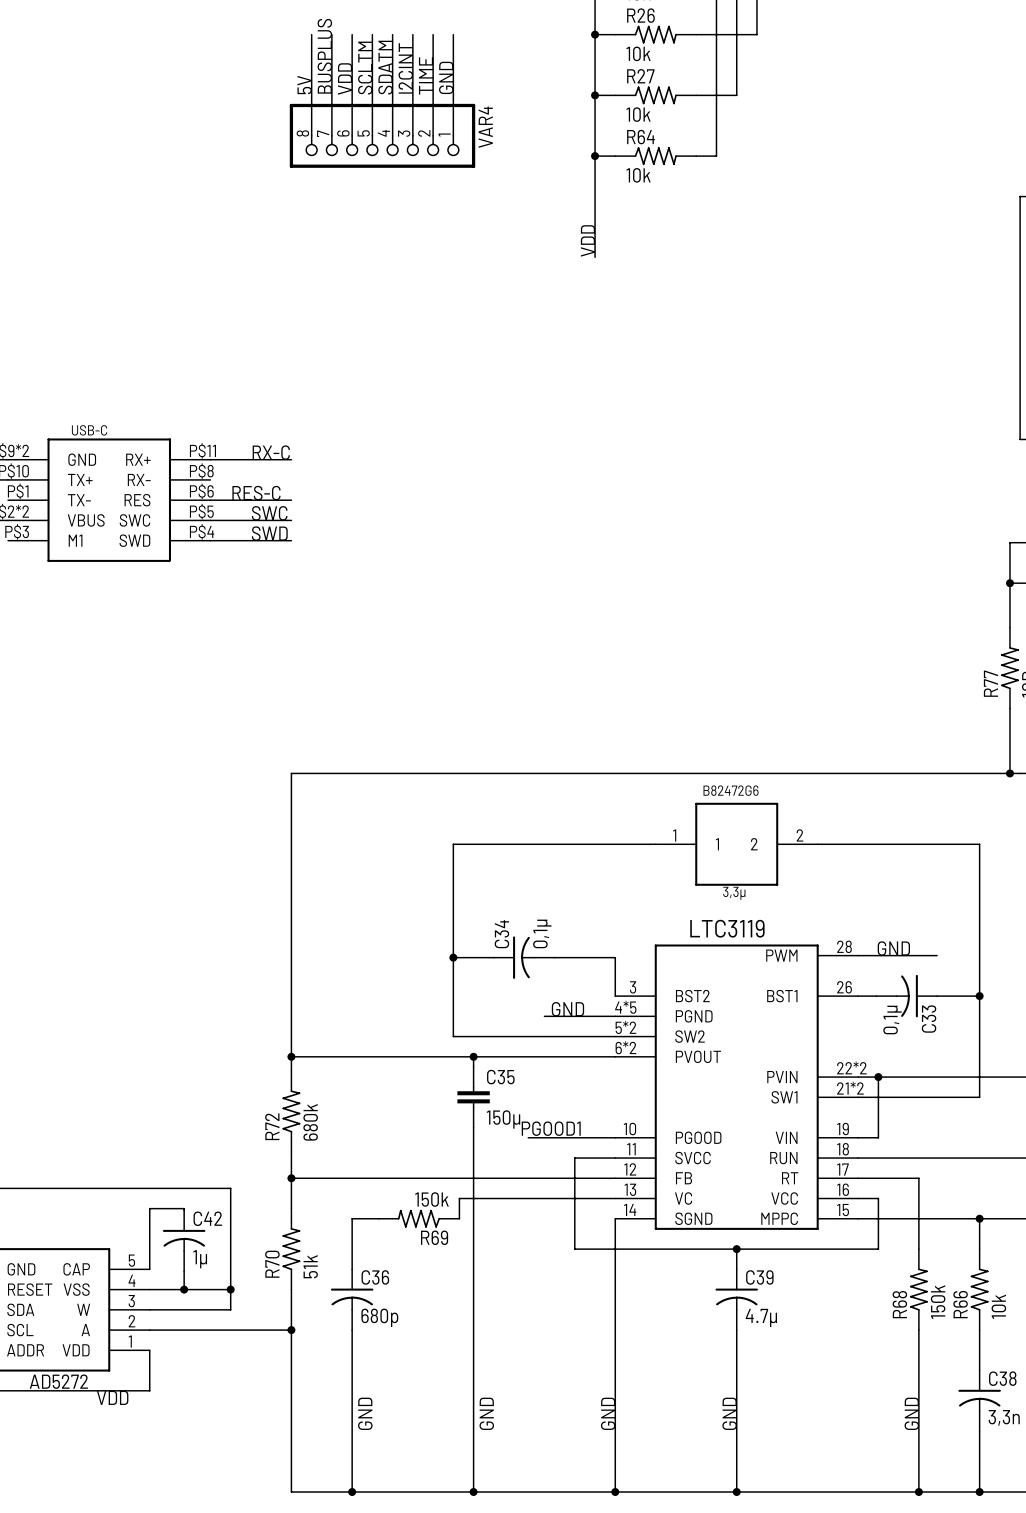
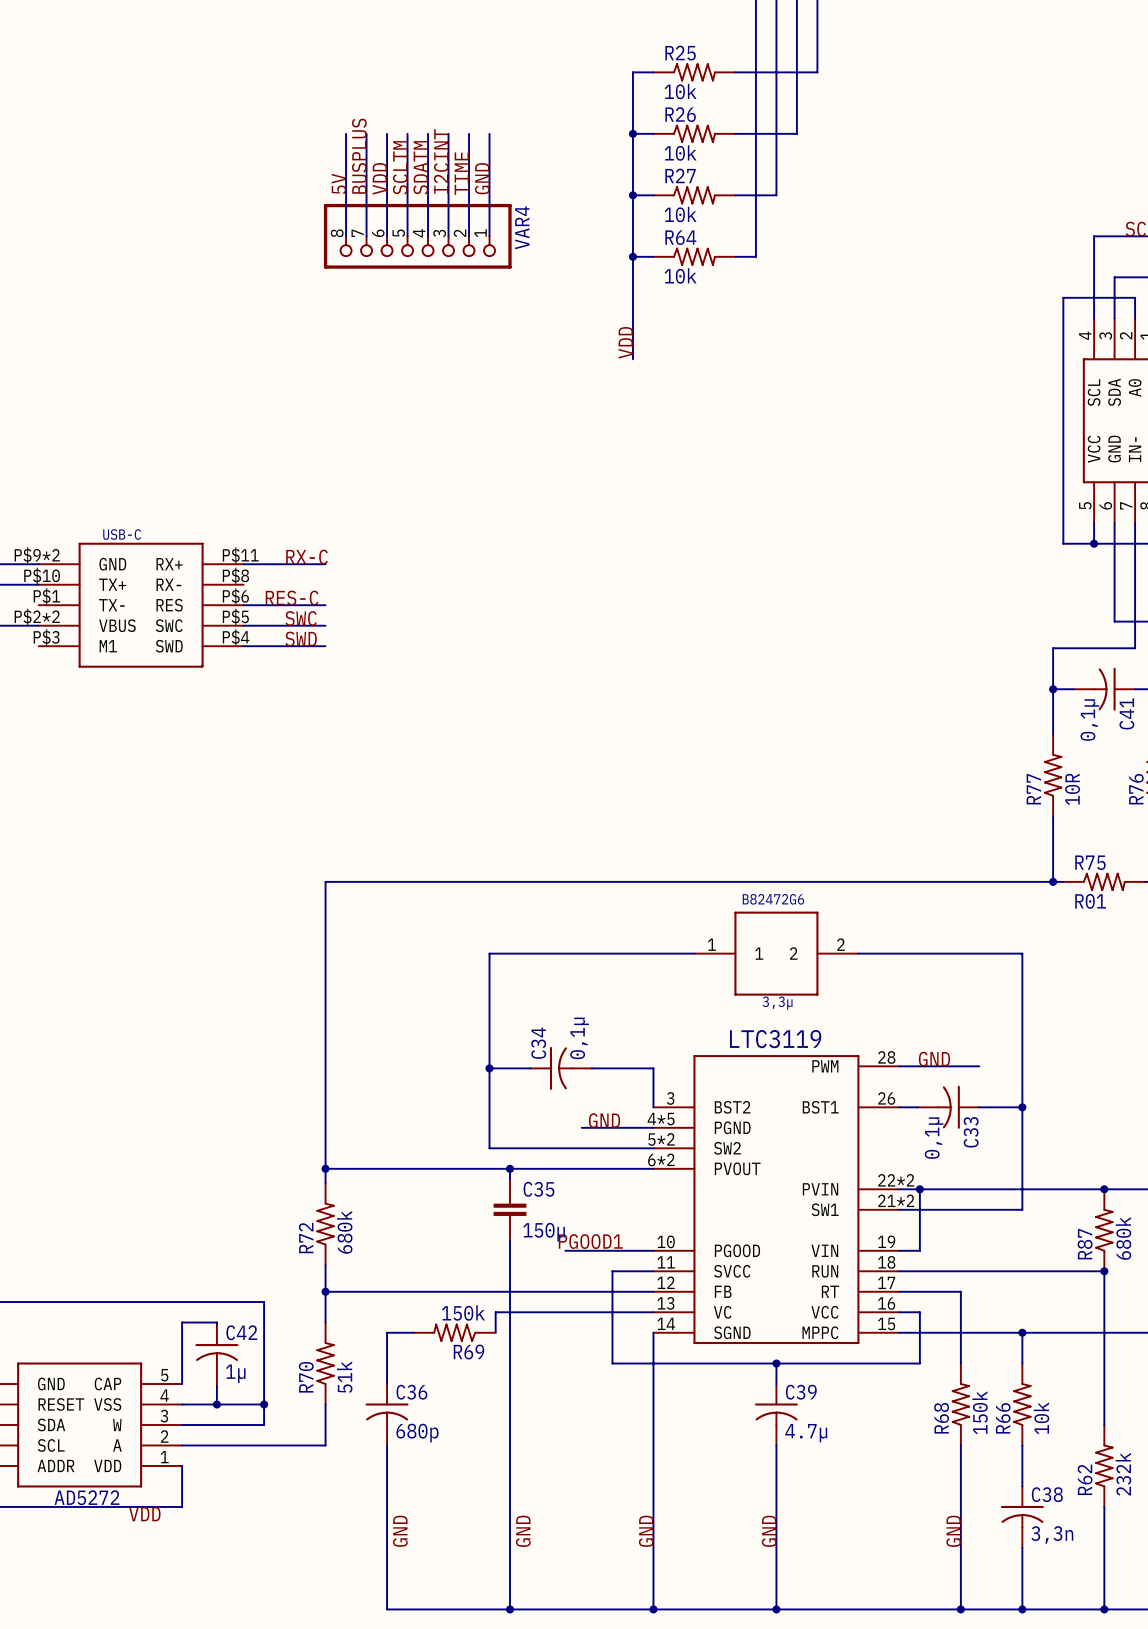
wire: (291, 1330) (291, 1492) (352, 1492) -> none
junction: (291, 1330) -> none
junction: (352, 1492) -> none

